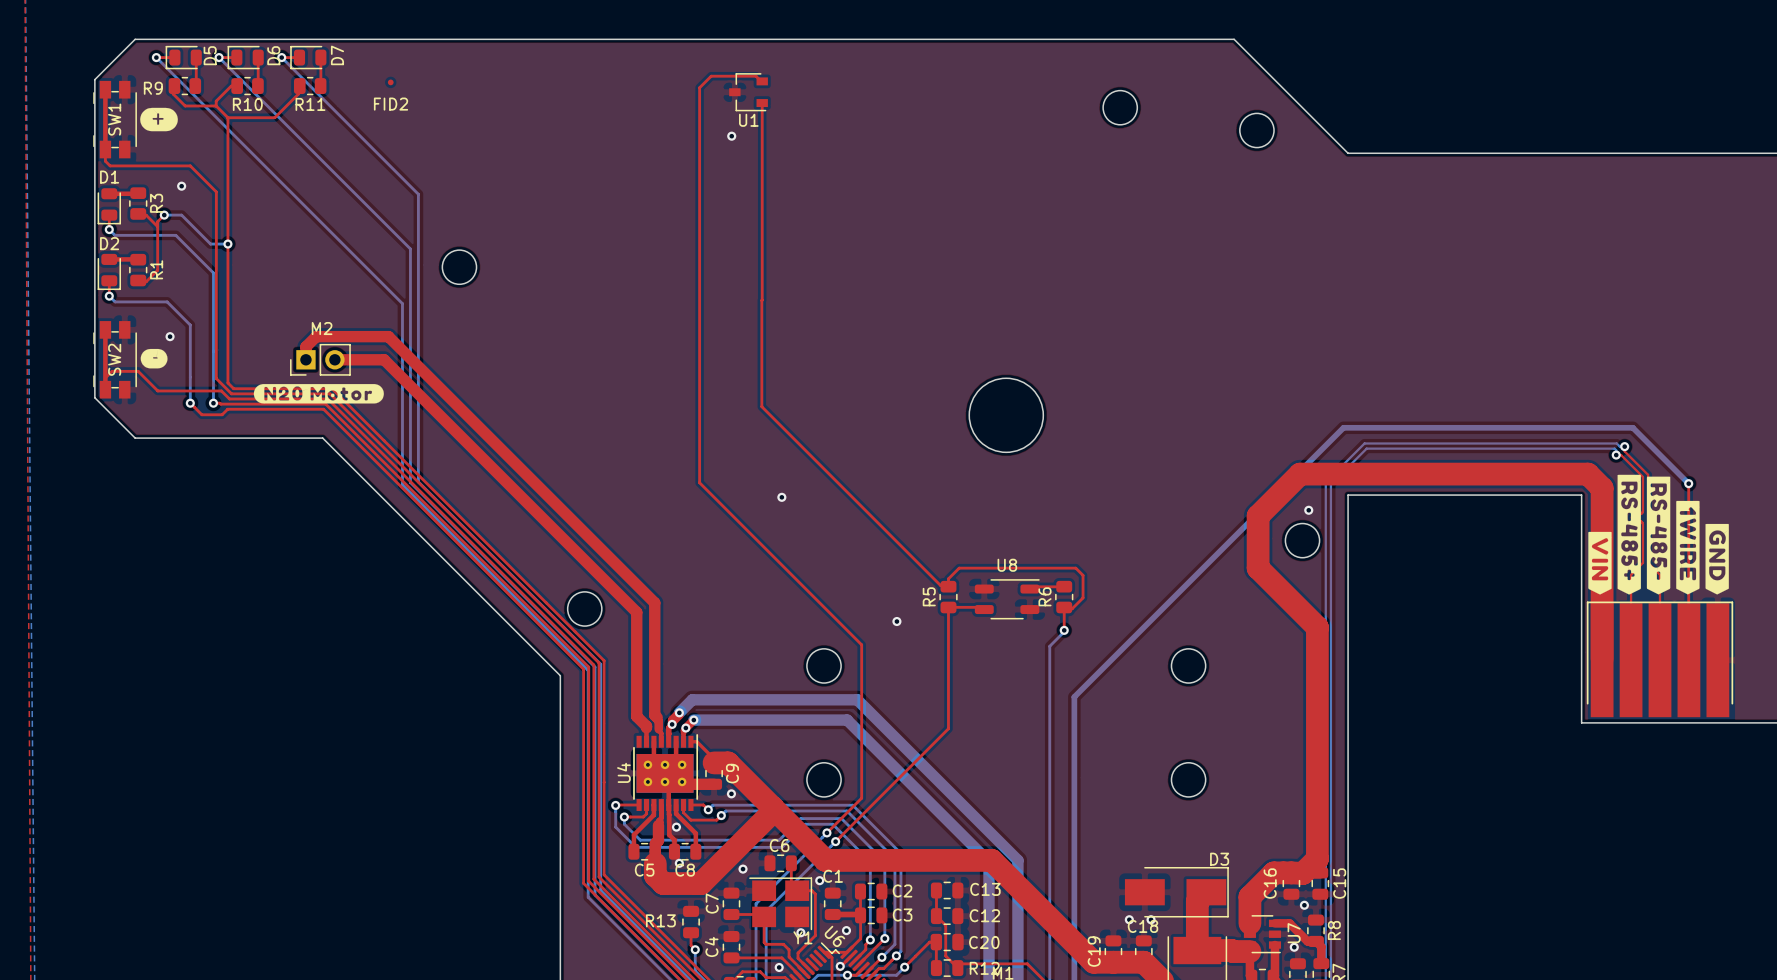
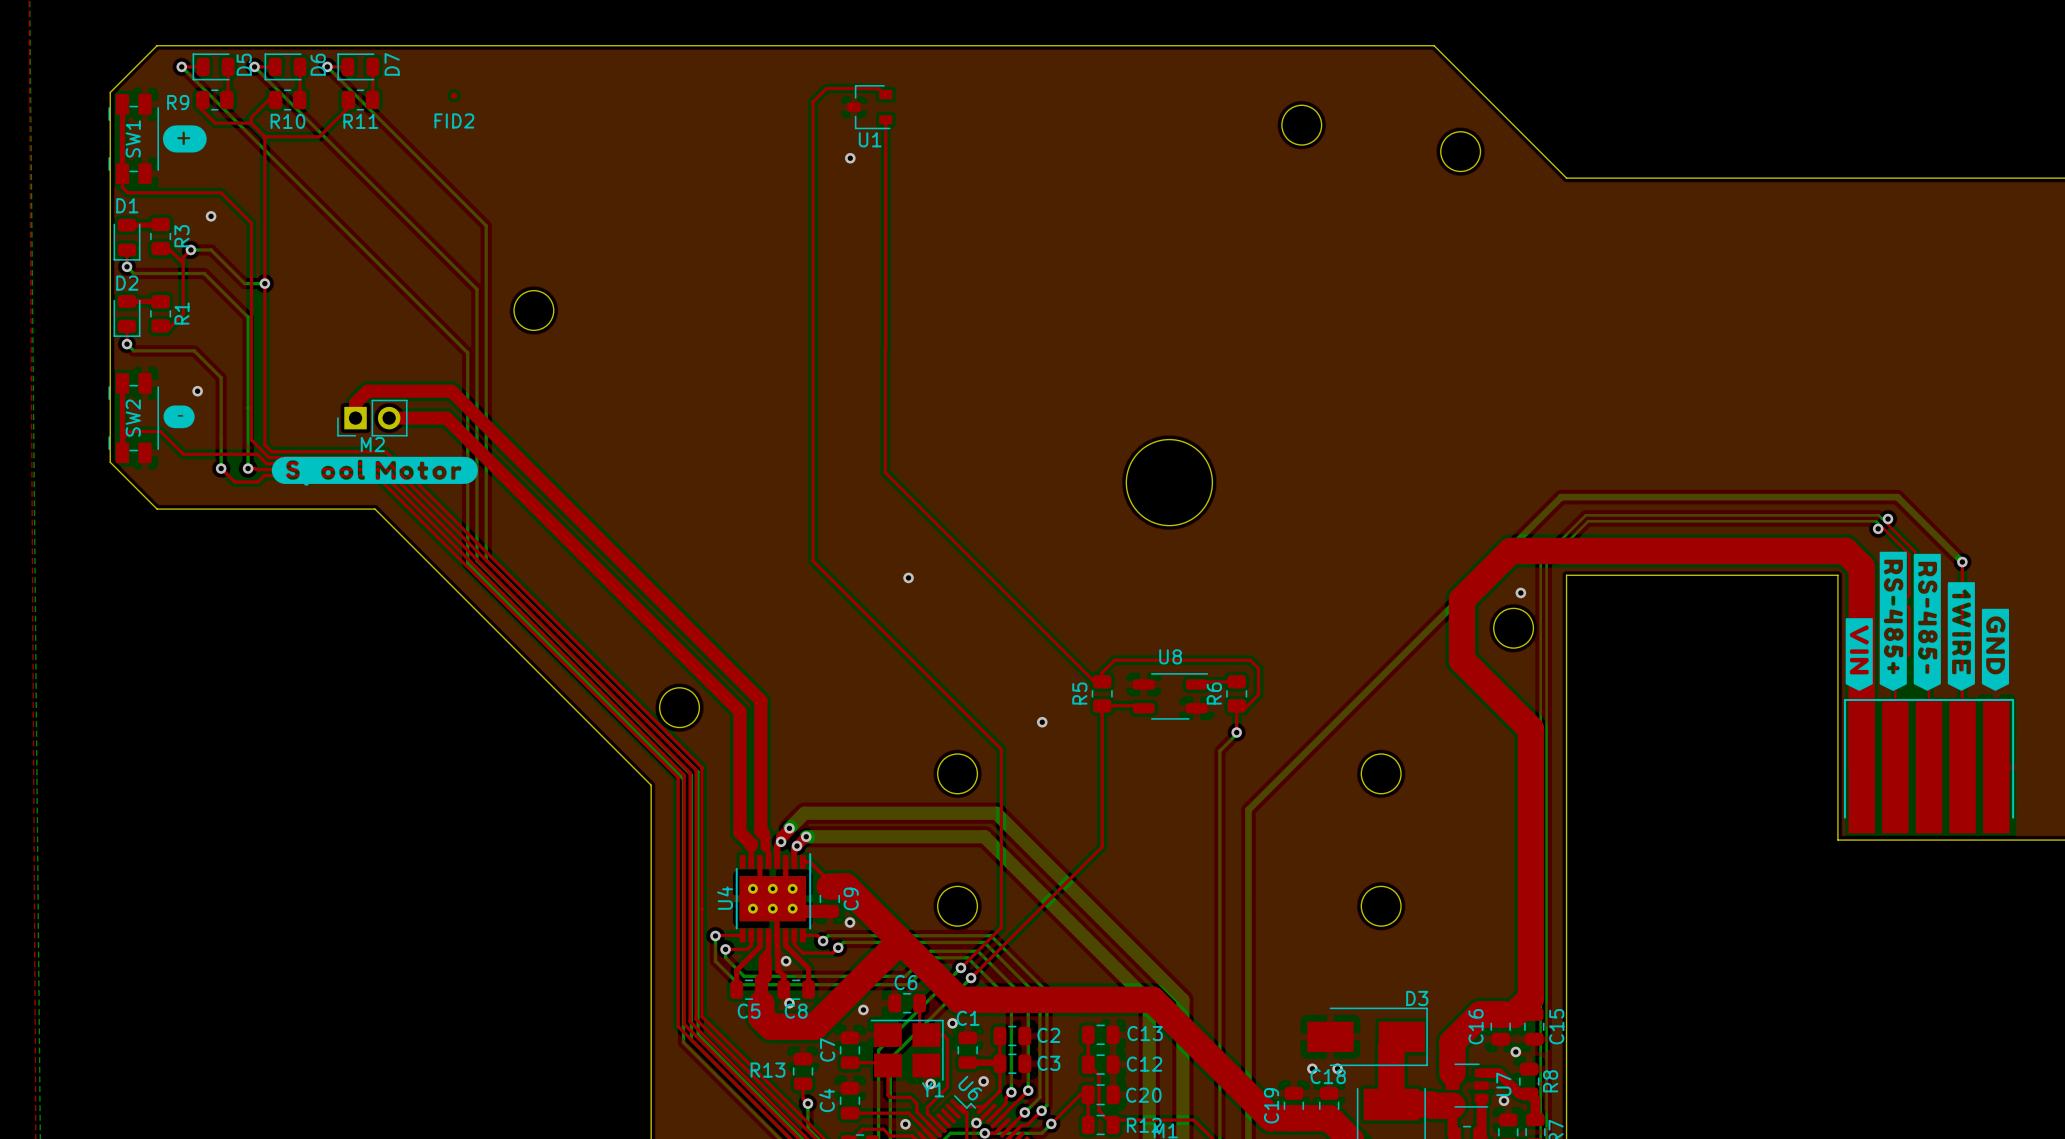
M2 name position: M2 (322, 328) -> M2 (372, 444)
drawing: [253, 384, 384, 404] -> none
drawing: none -> [271, 456, 478, 486]

